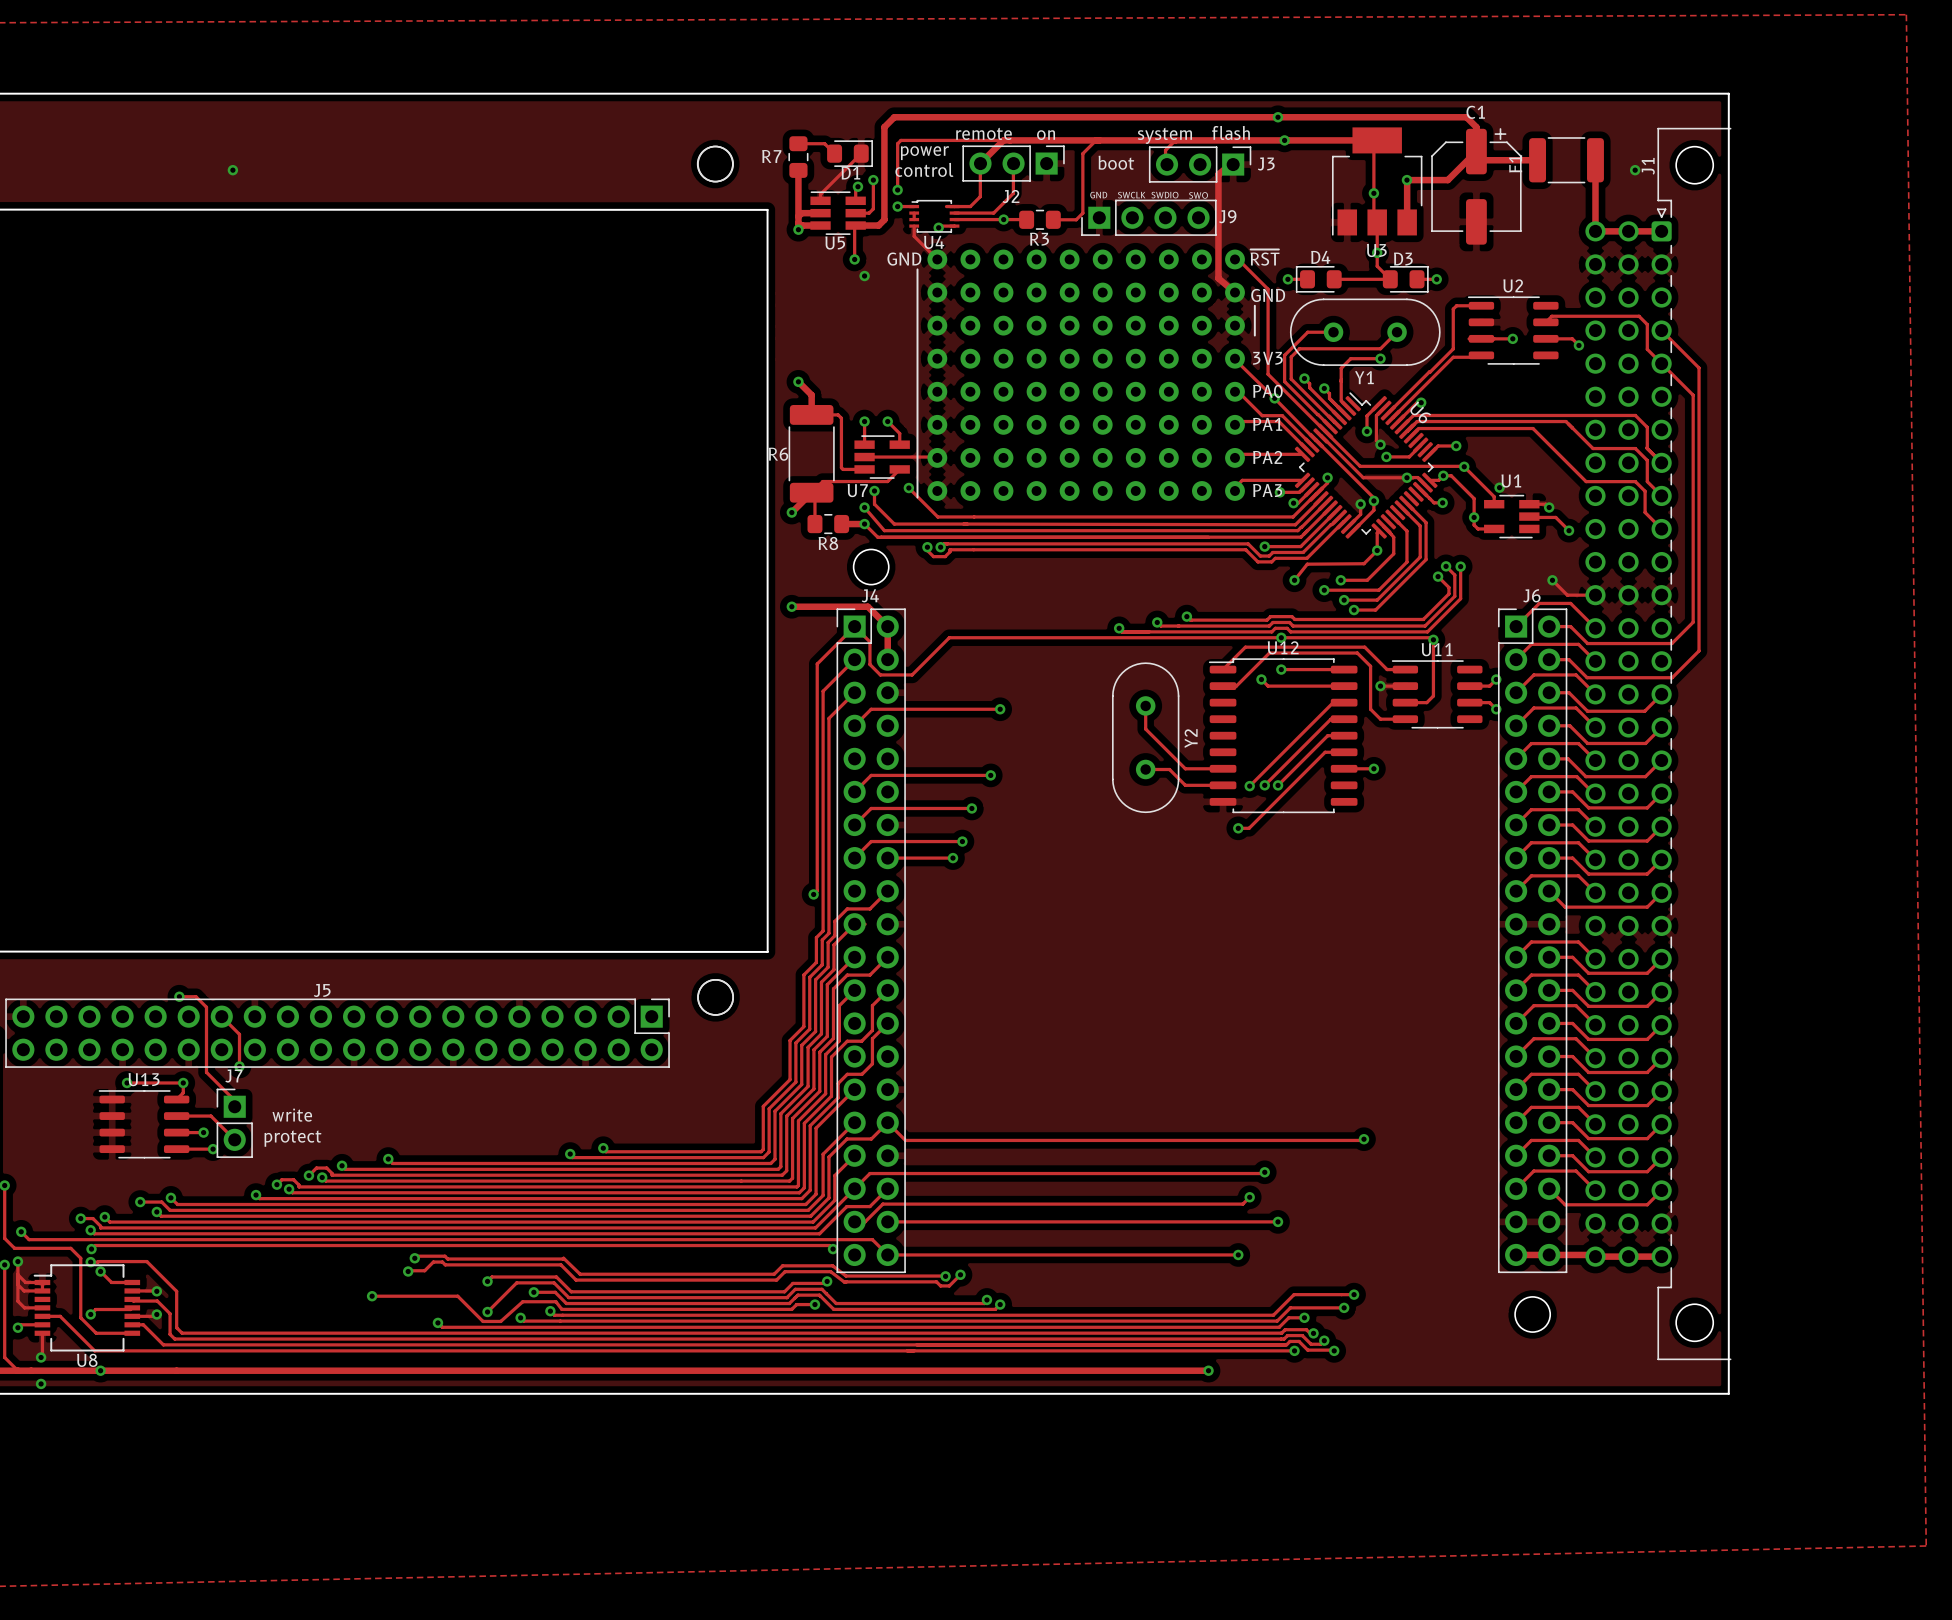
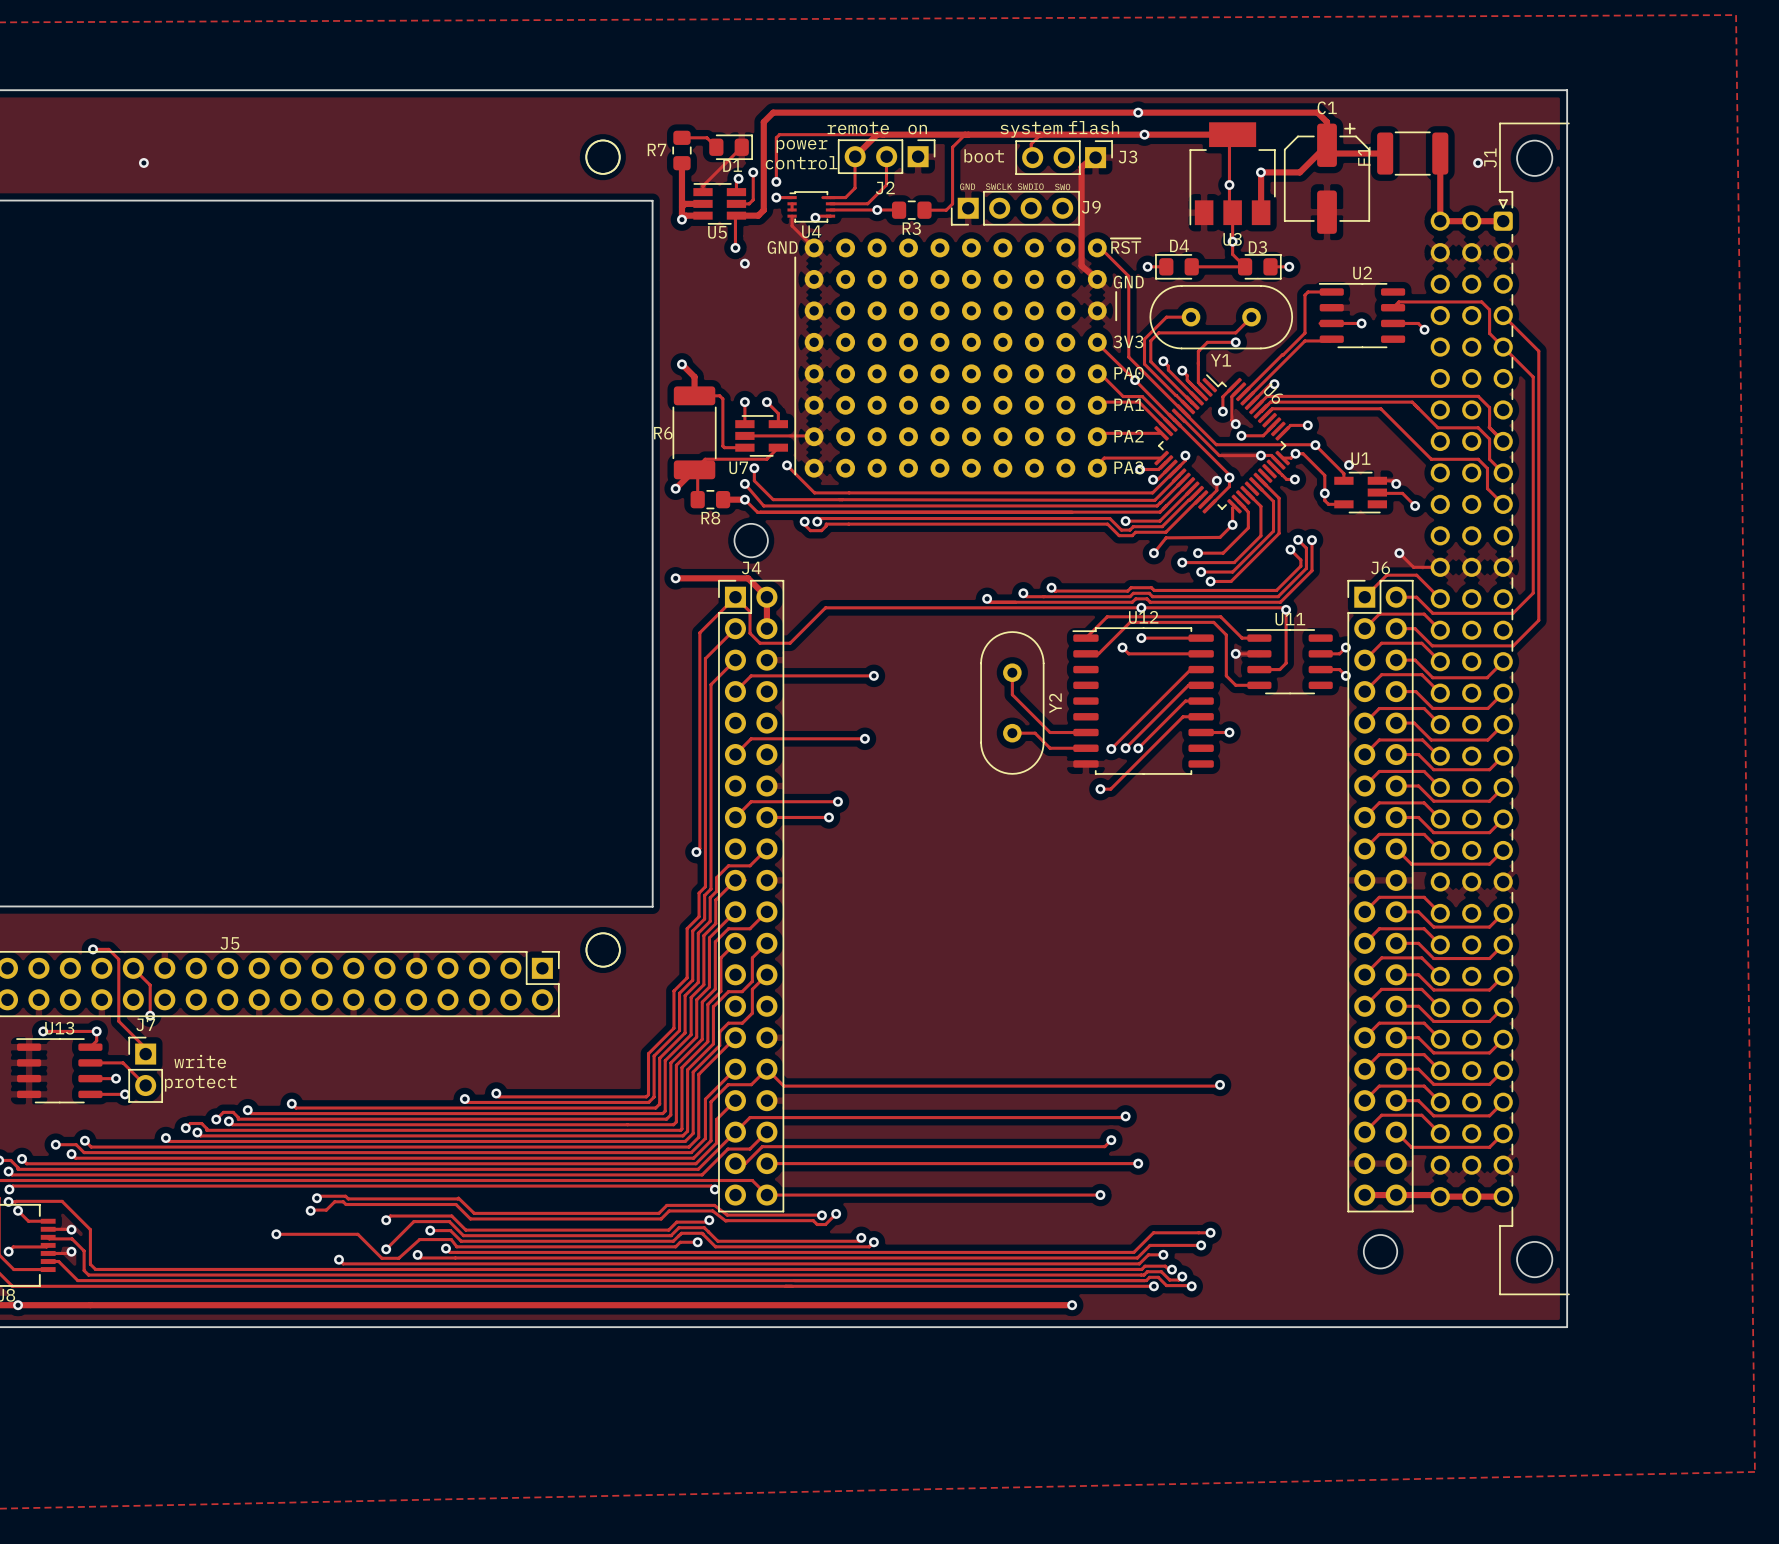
track: (971, 808) (871, 808) (854, 825) -> none
via: (971, 808) -> none

